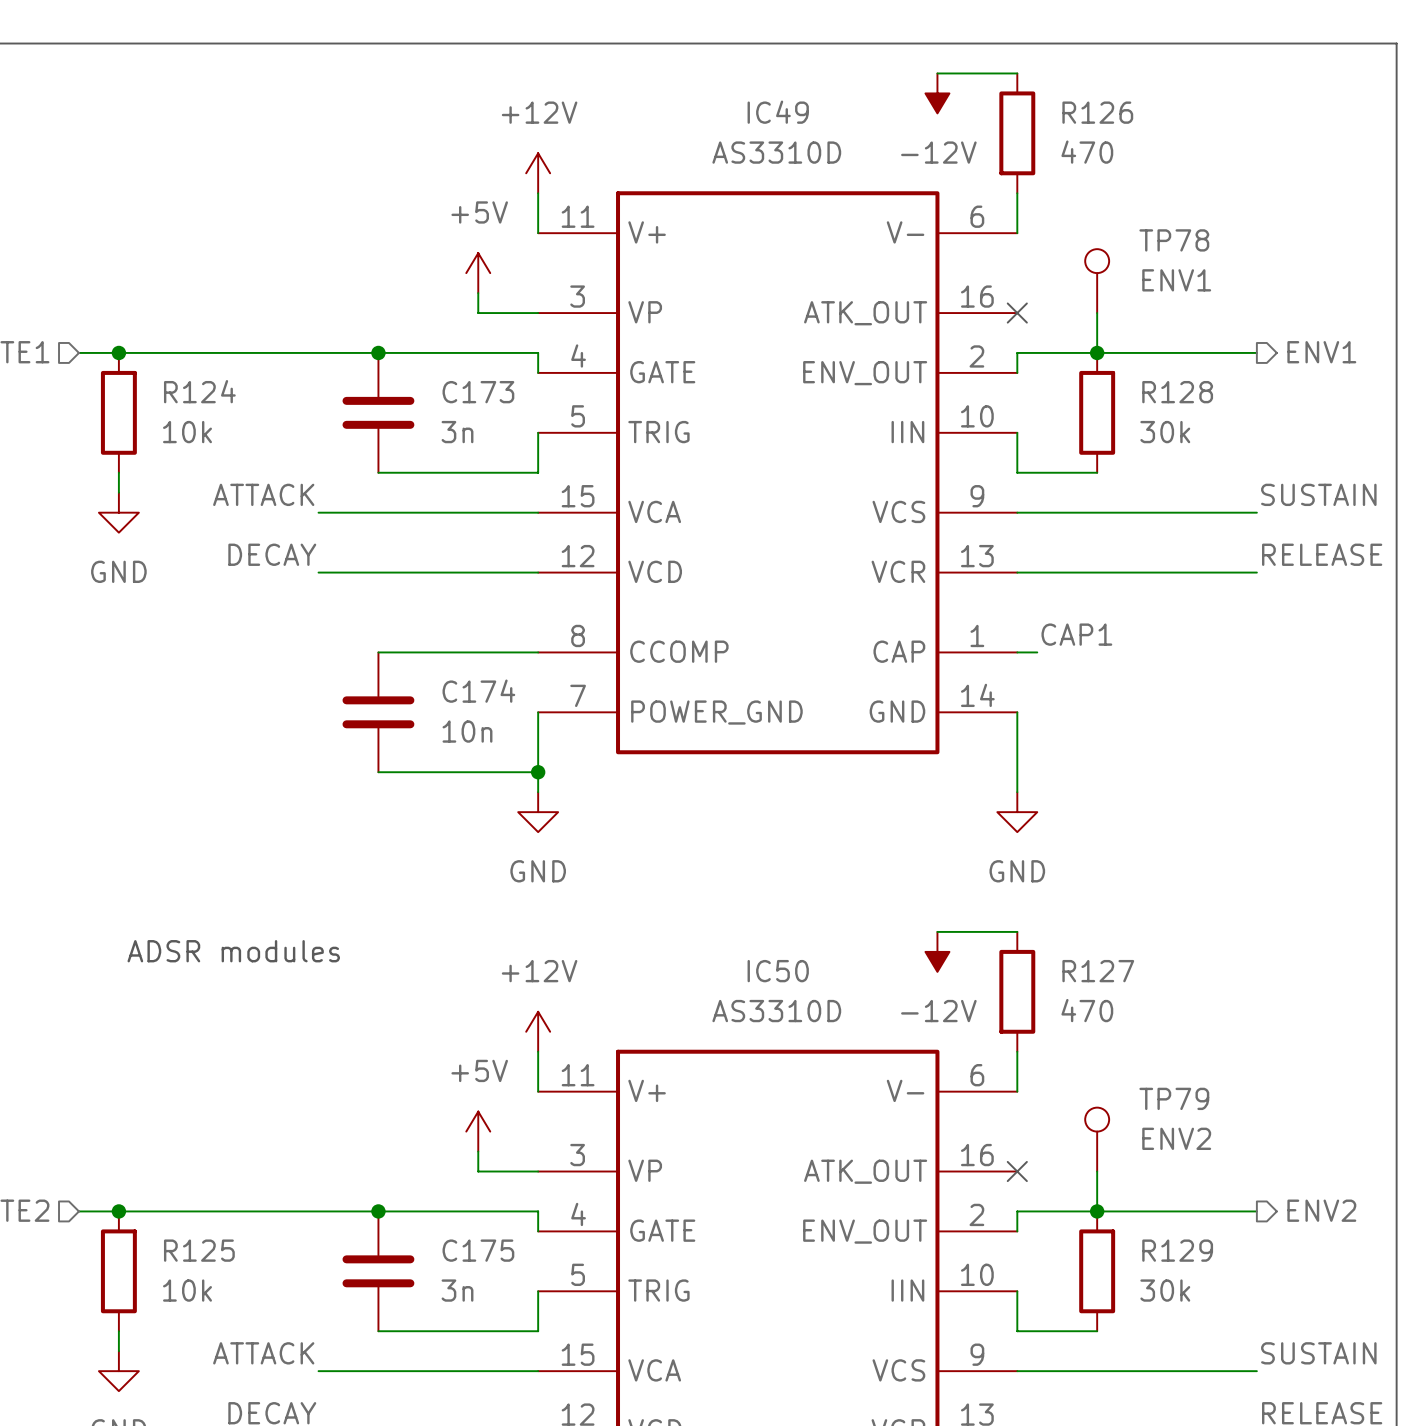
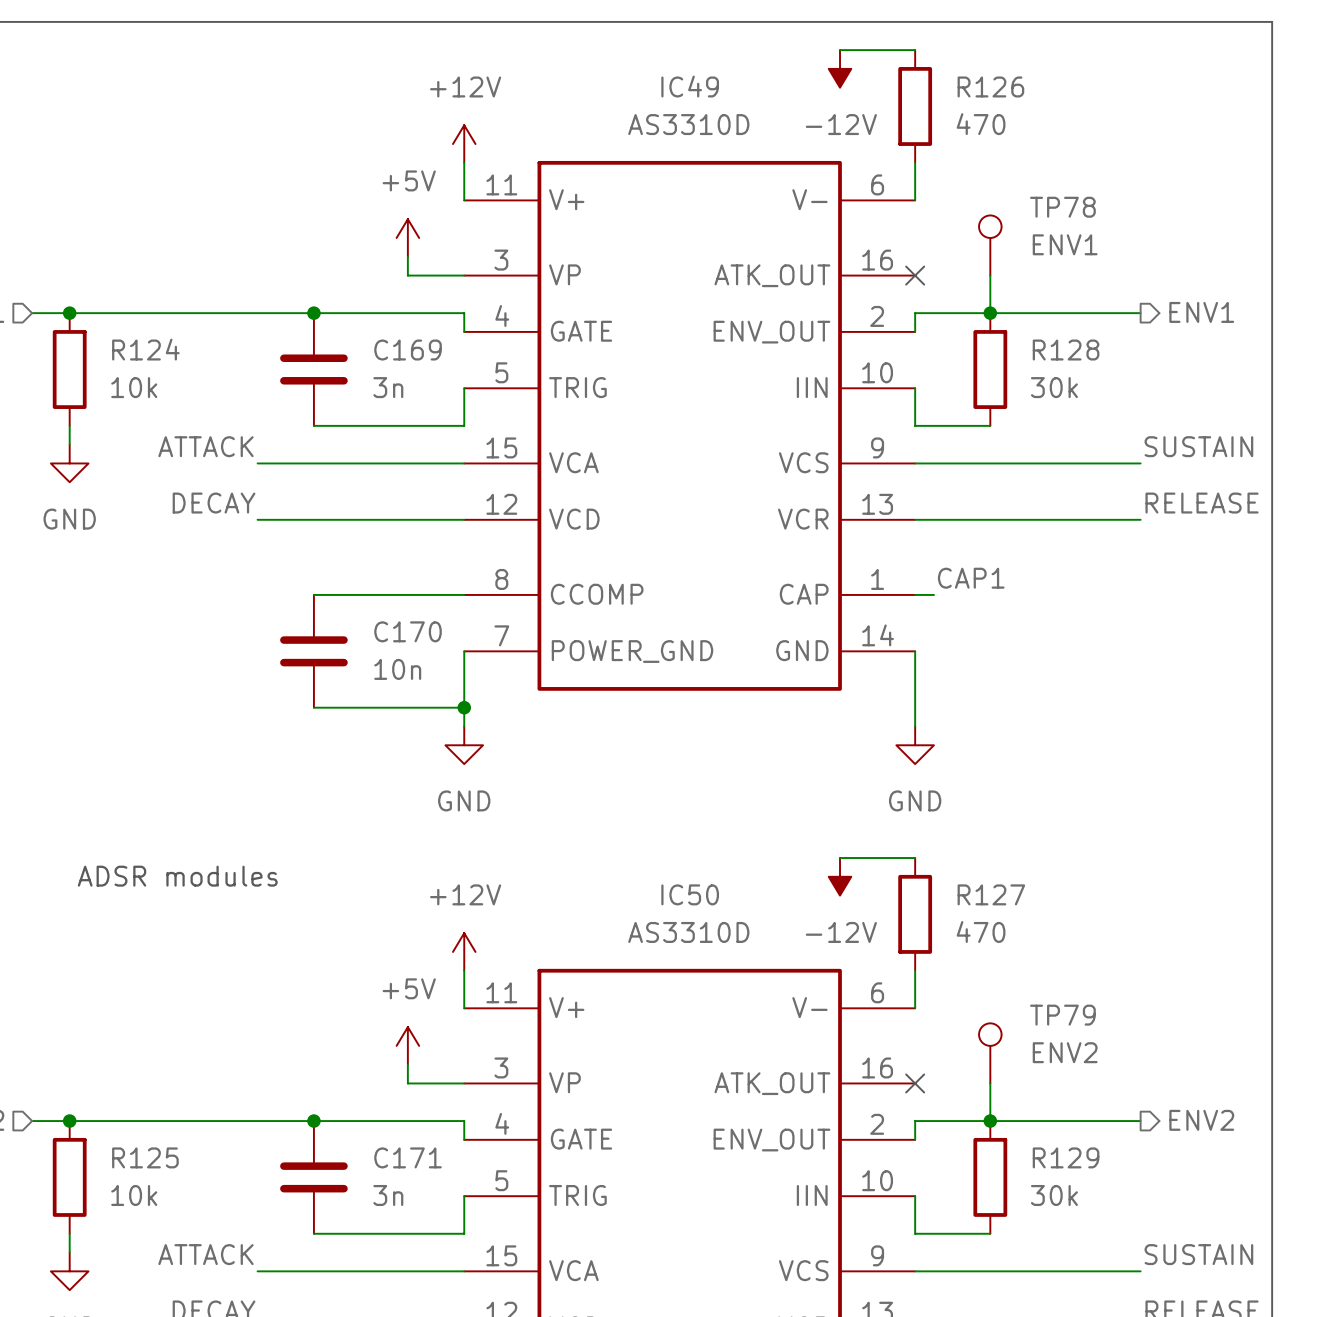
C173 name: C173 (478, 392) -> C169 (408, 350)
C174 name: C174 (478, 691) -> C170 (408, 631)
C175 name: C175 (478, 1250) -> C171 (408, 1157)

